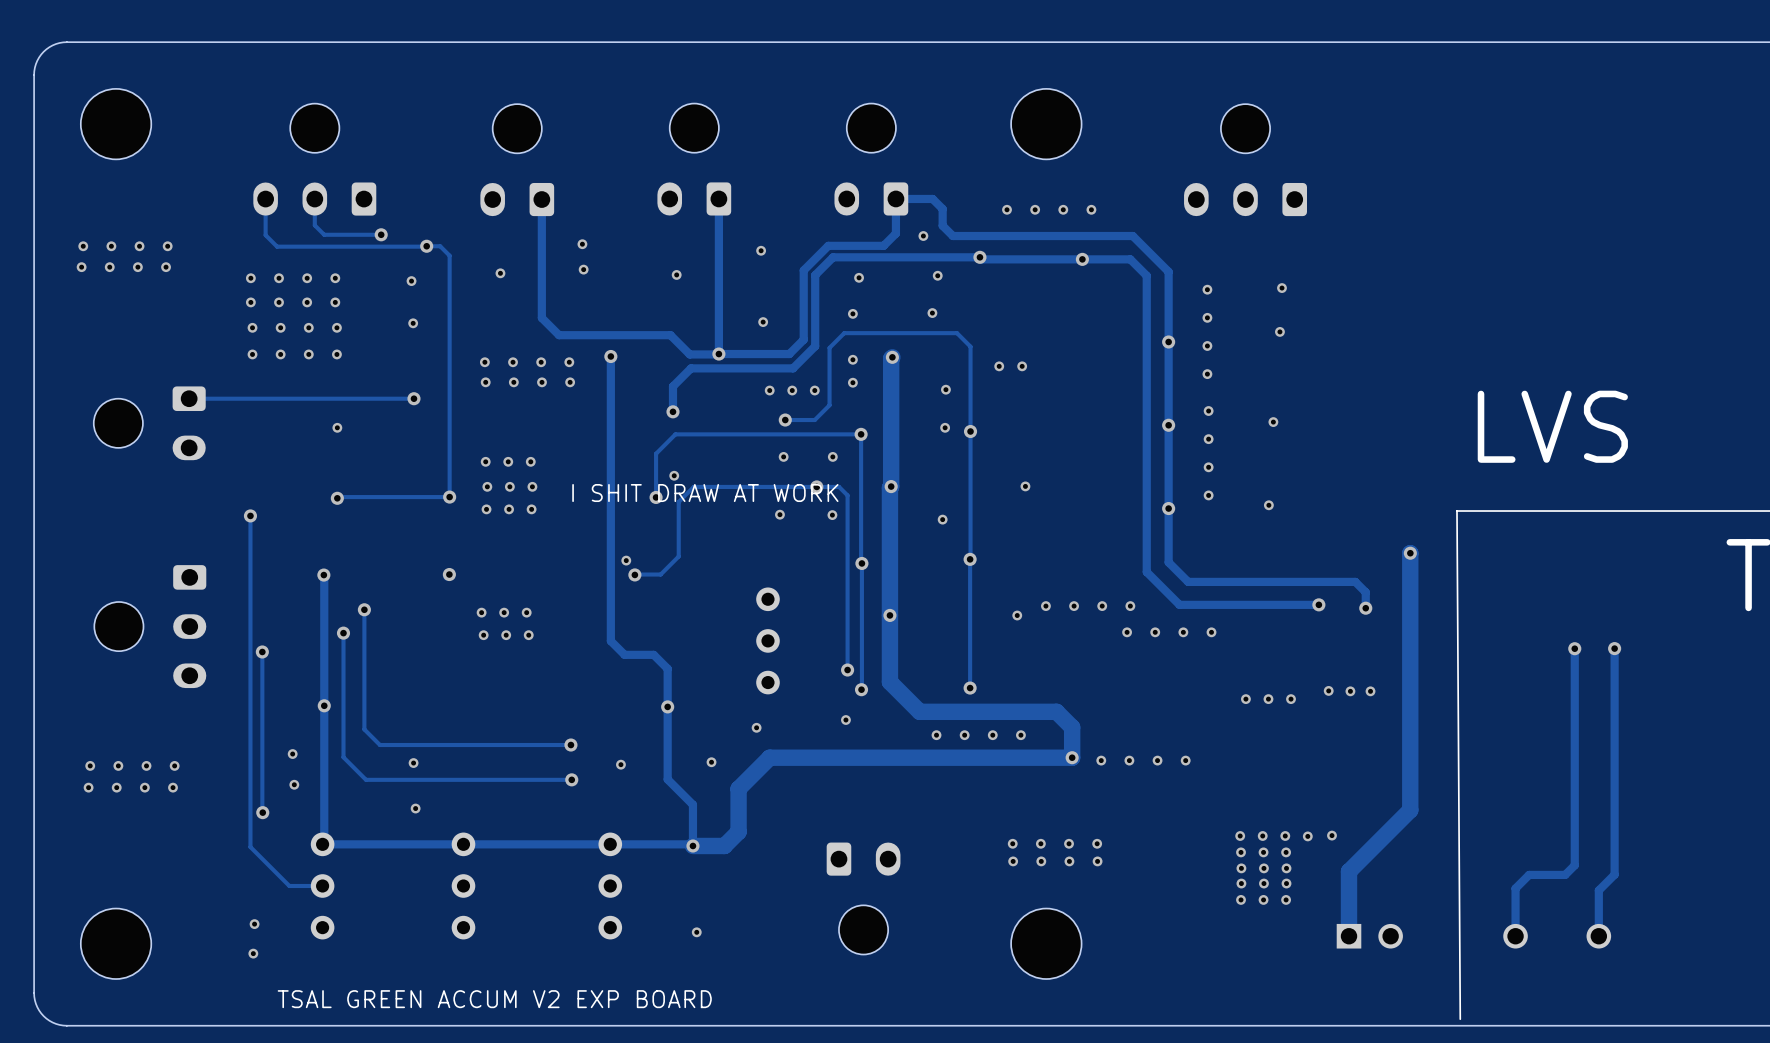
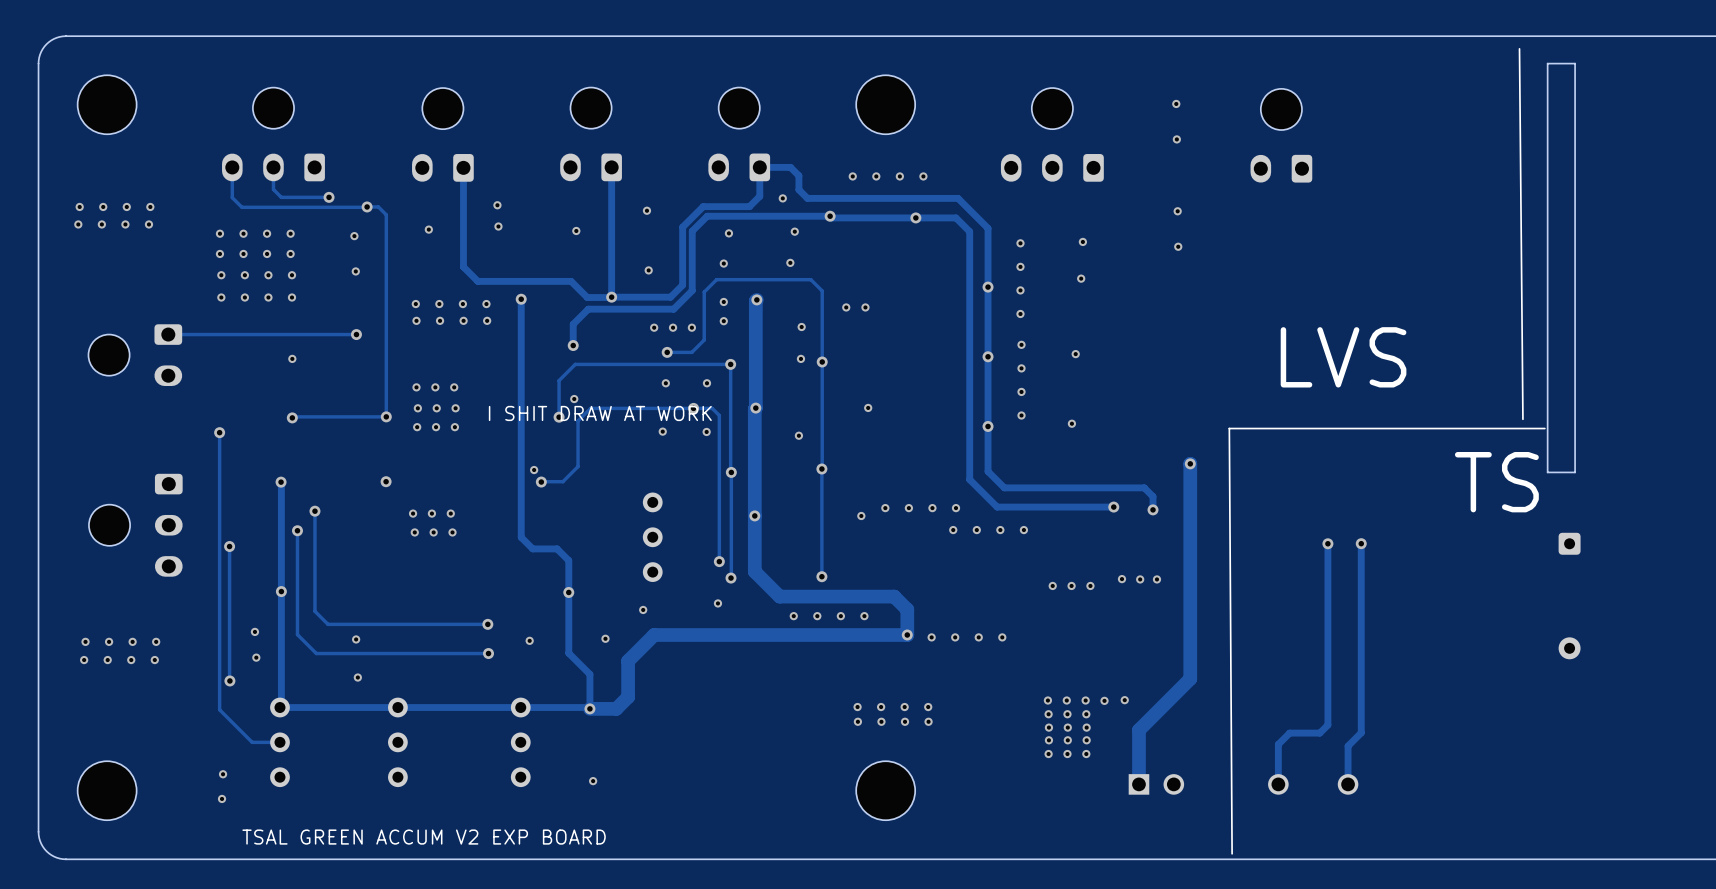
via: none -> (1176, 103)
part: none -> (1281, 135)
via: none -> (1176, 139)
via: none -> (1177, 211)
via: none -> (1178, 246)
text position: LVS (1552, 426) -> LVS (1343, 357)
part: (863, 898) -> none

